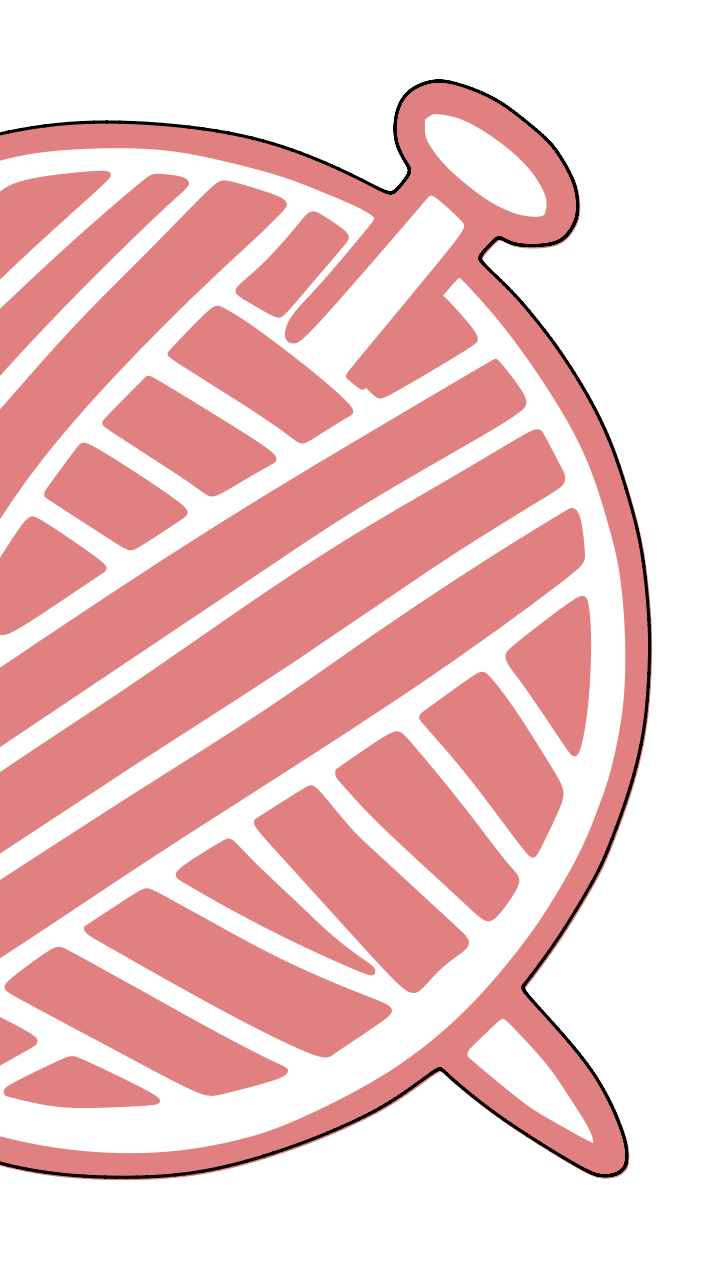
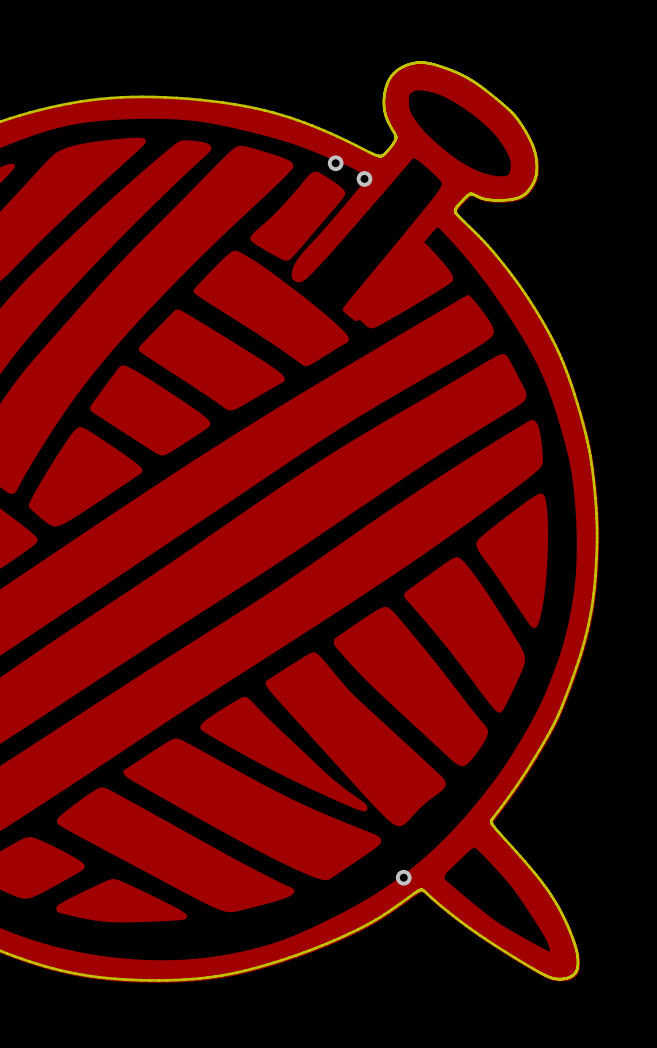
via: none -> (335, 163)
via: none -> (364, 178)
via: none -> (403, 877)

